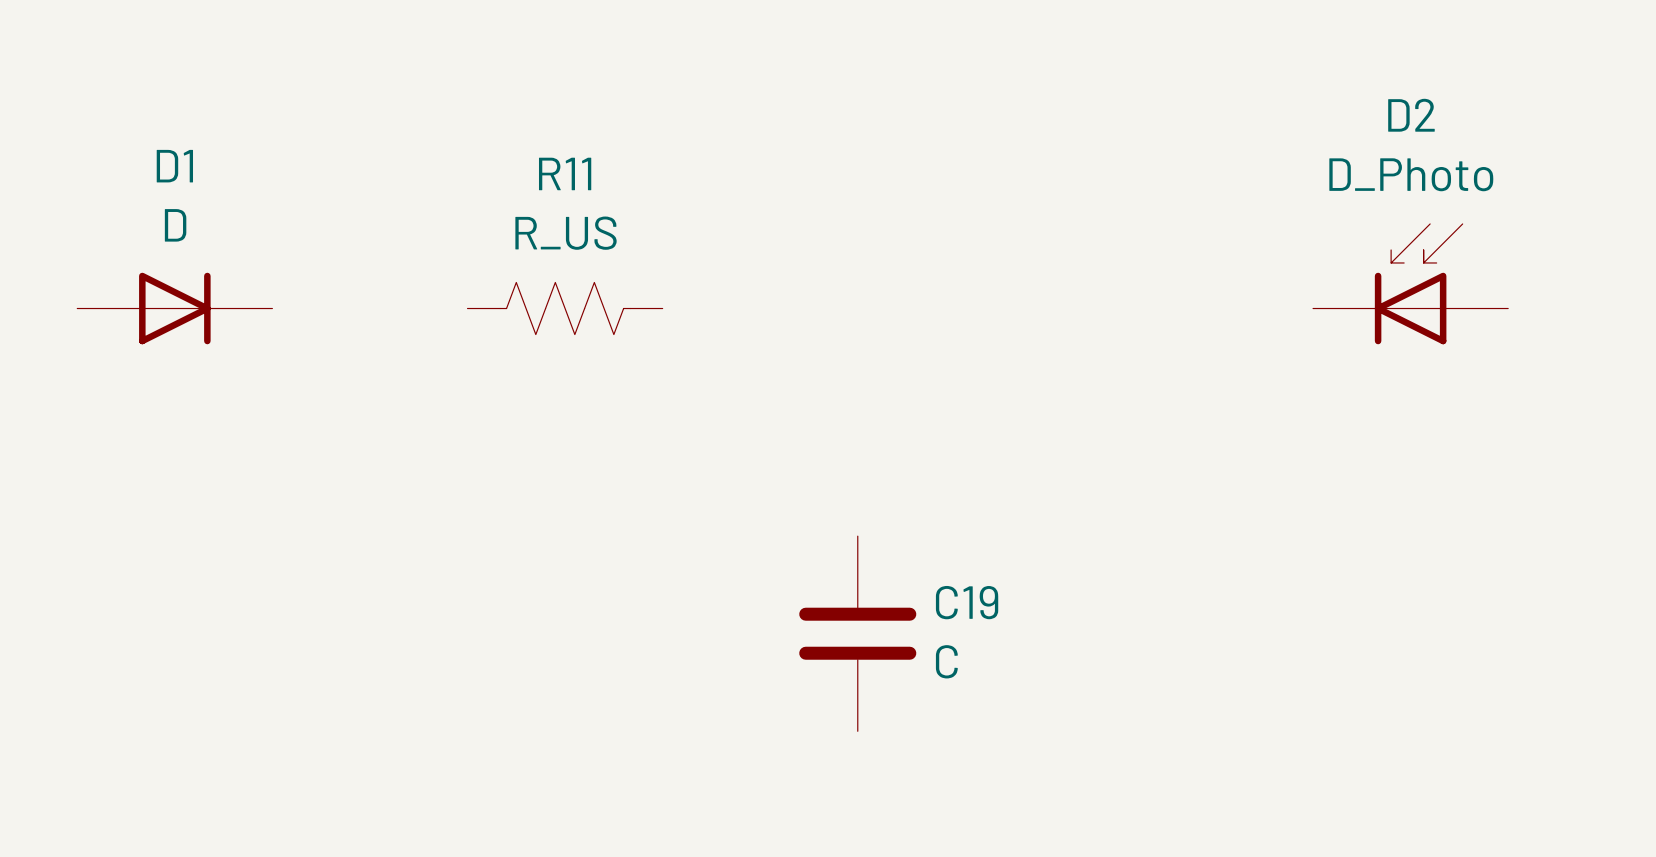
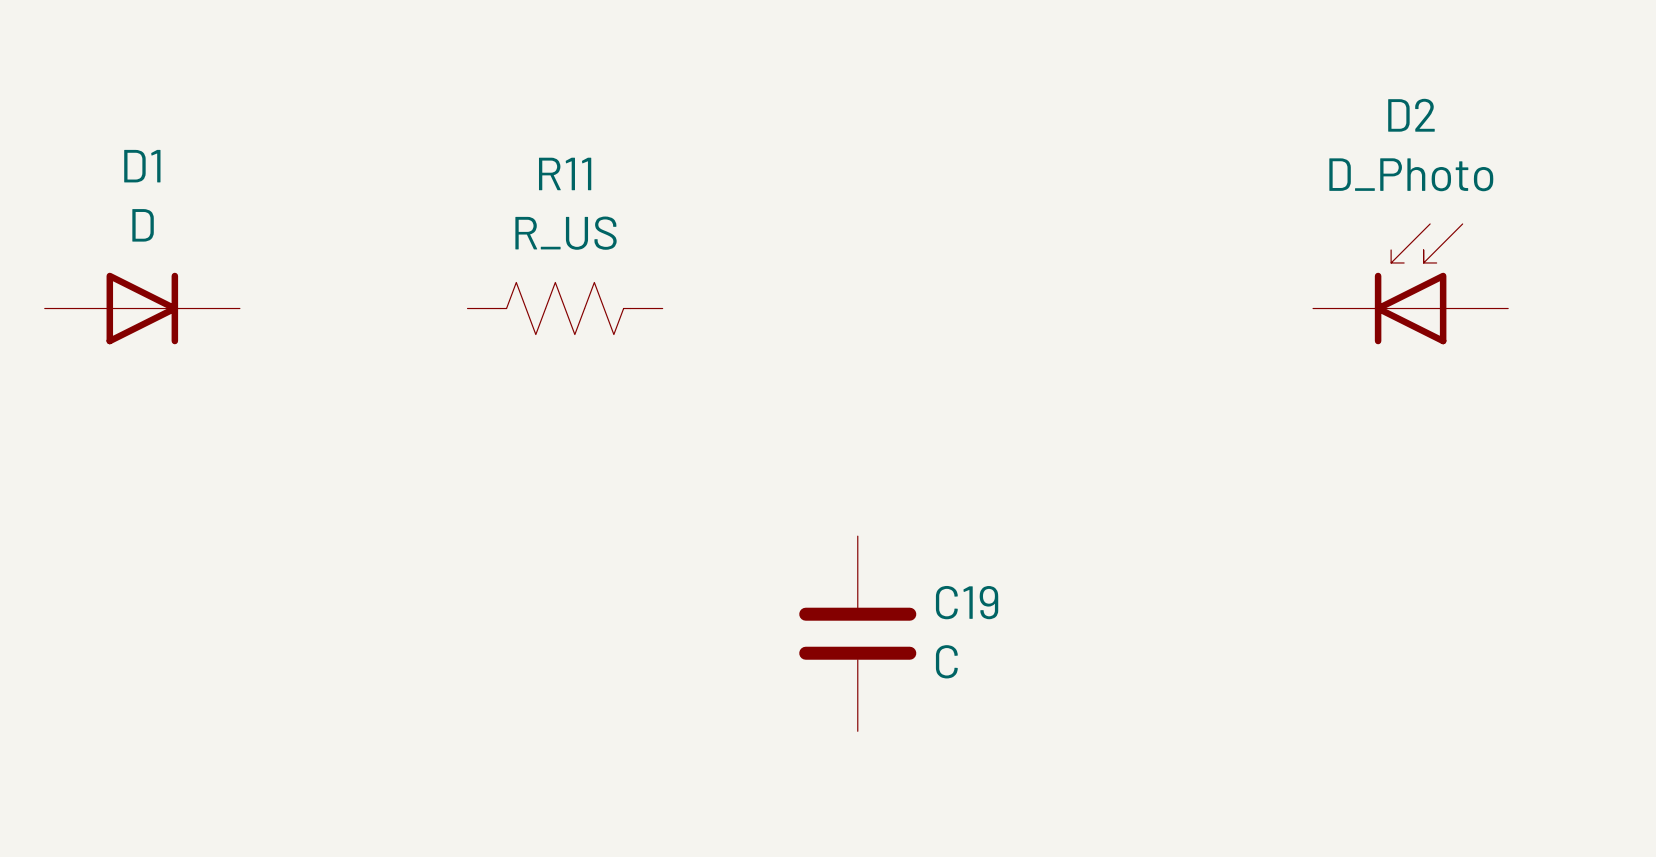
D1 position: (174, 308) -> (142, 308)

